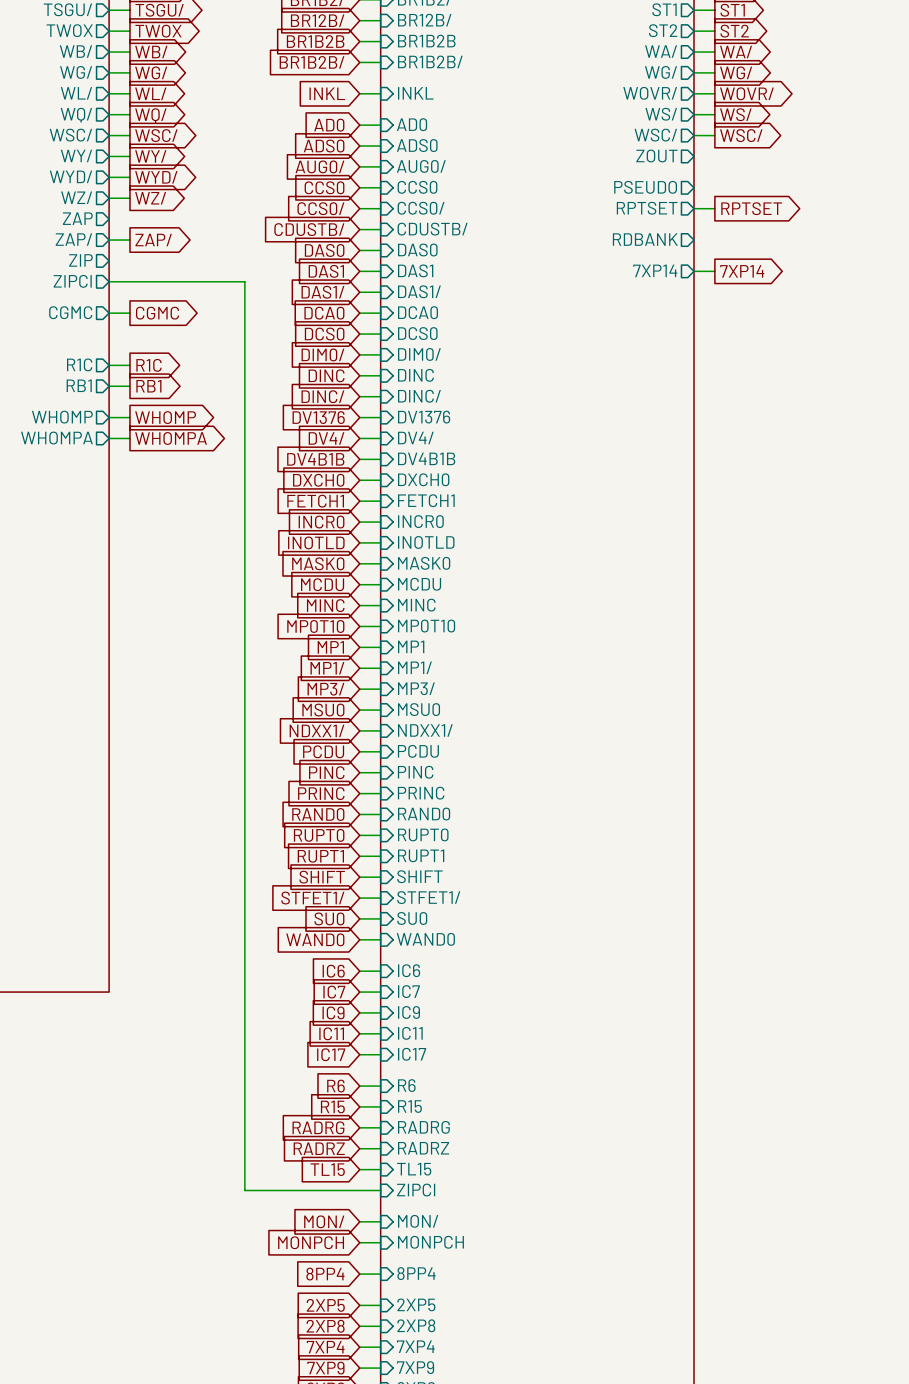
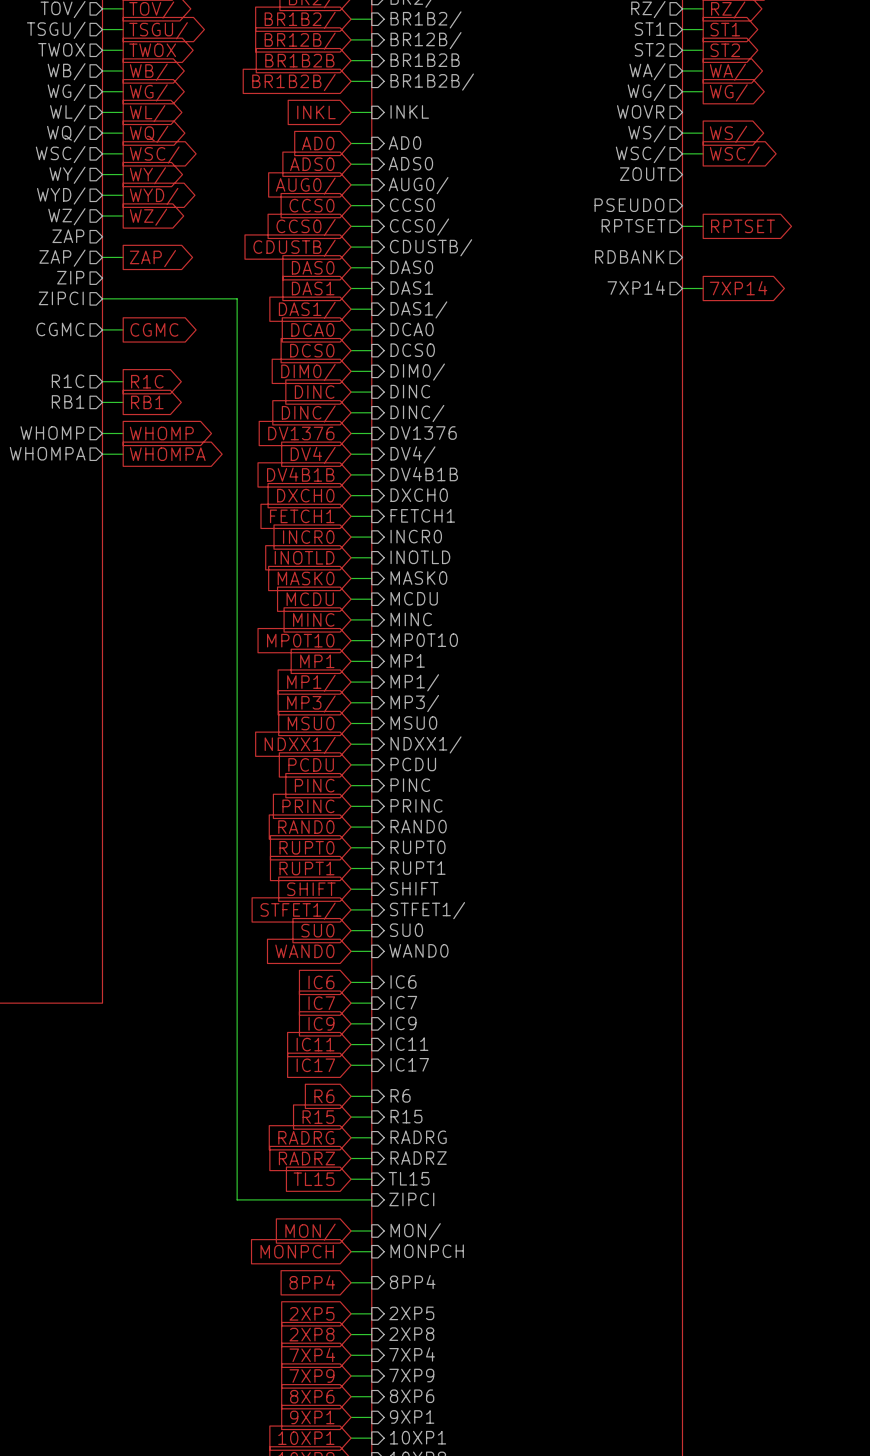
sheet pin: WOVR/ (650, 93) -> WOVR (640, 111)
wire: (694, 93) (714, 93) -> none
global label: WOVR/ (746, 93) -> none

